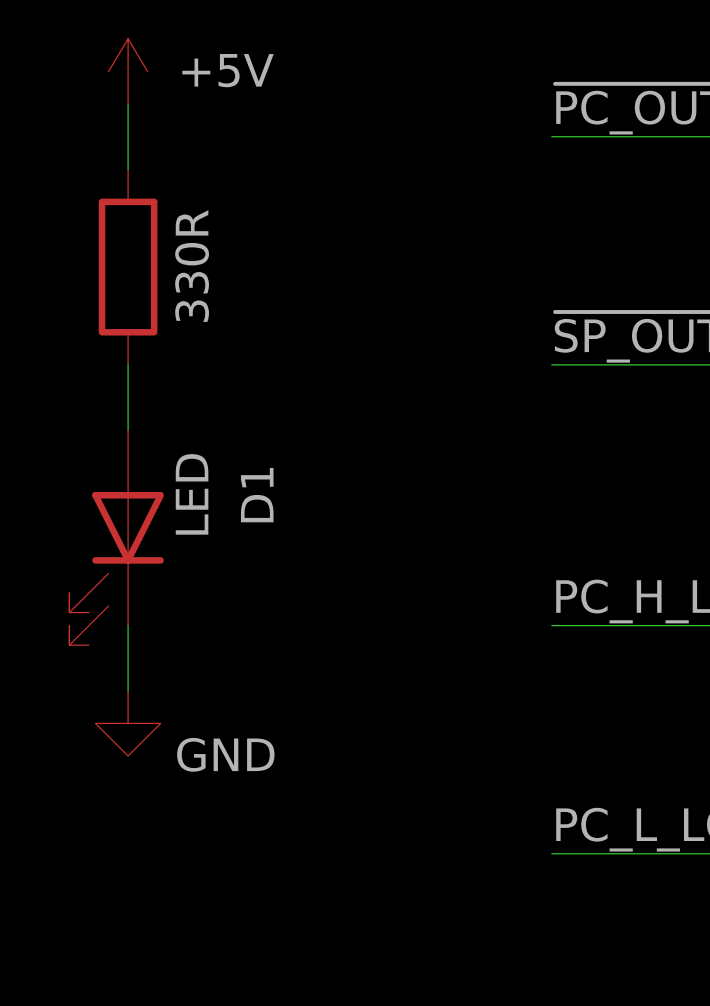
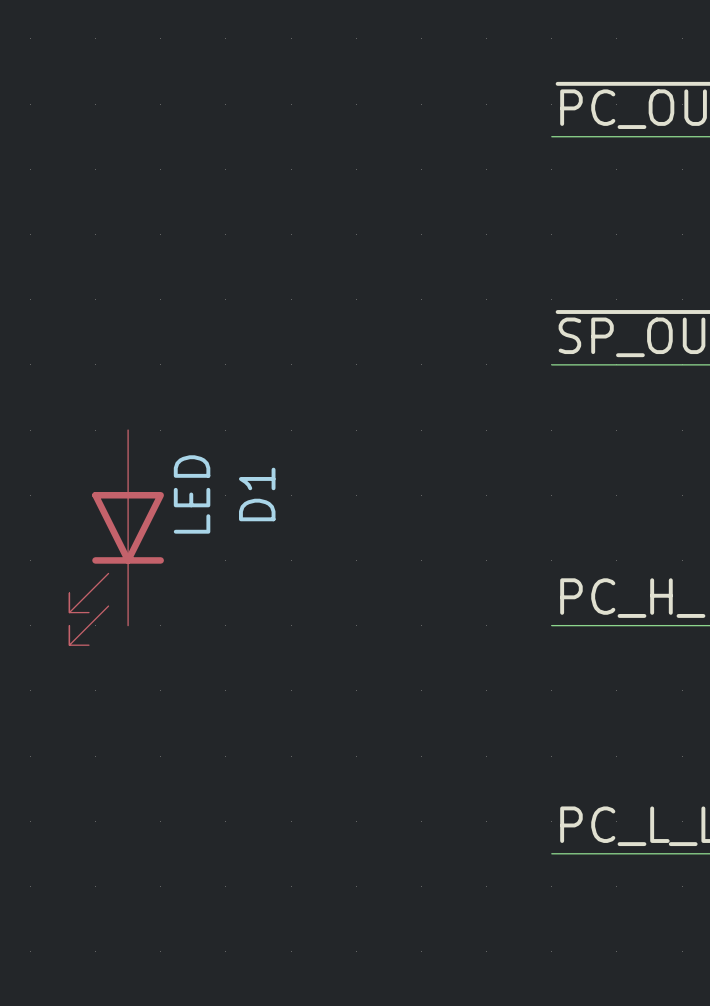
power symbol: +5V (128, 71) -> none
wire: (128, 104) (128, 169) -> none
part: 330R (128, 267) -> none
wire: (128, 364) (128, 430) -> none
wire: (128, 625) (128, 690) -> none
power symbol: GND (128, 723) -> none

